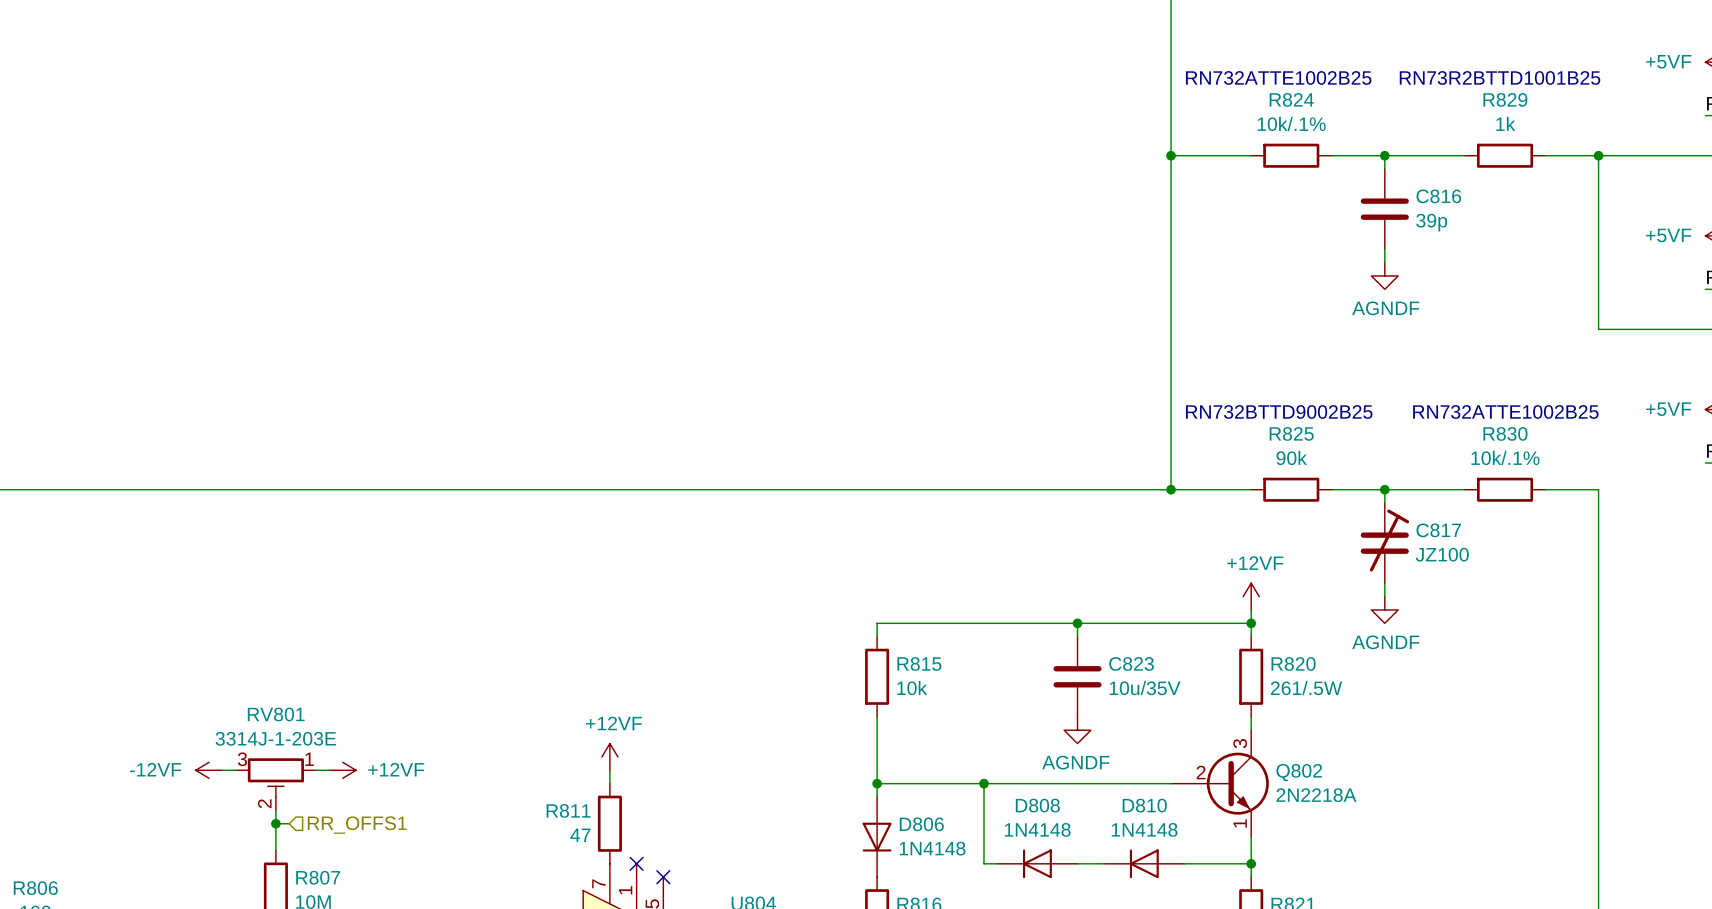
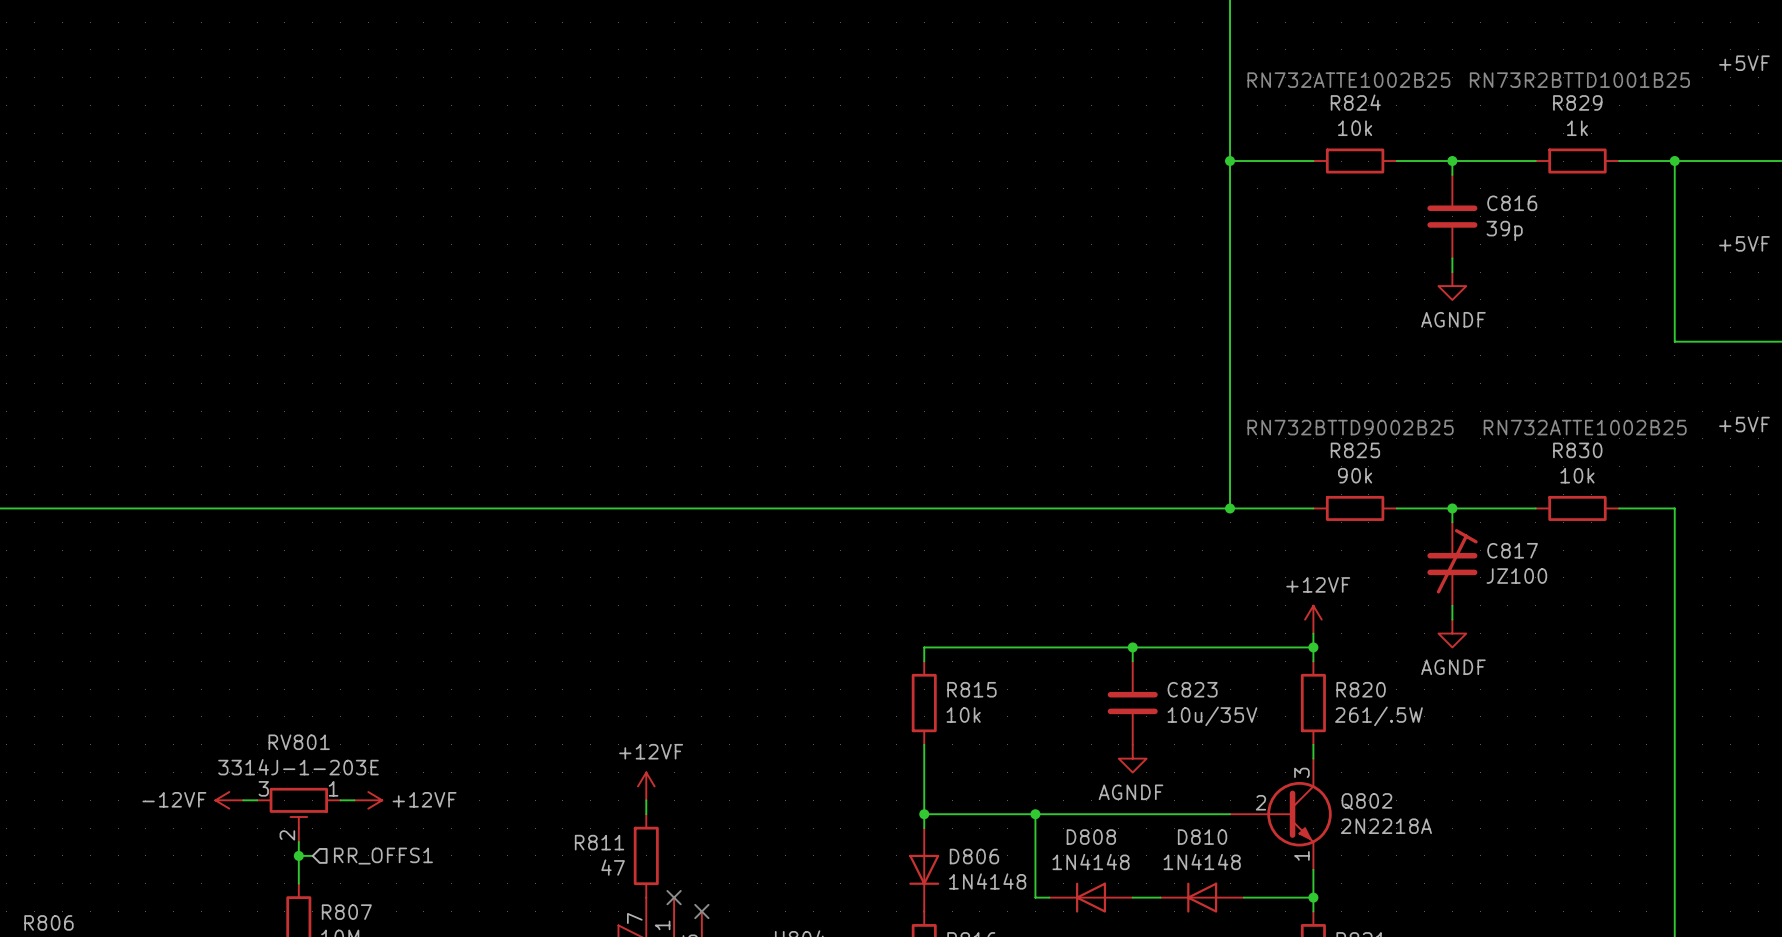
R824 value: 10k/.1% (1291, 123) -> 10k (1355, 128)
R830 value: 10k/.1% (1505, 457) -> 10k (1577, 475)

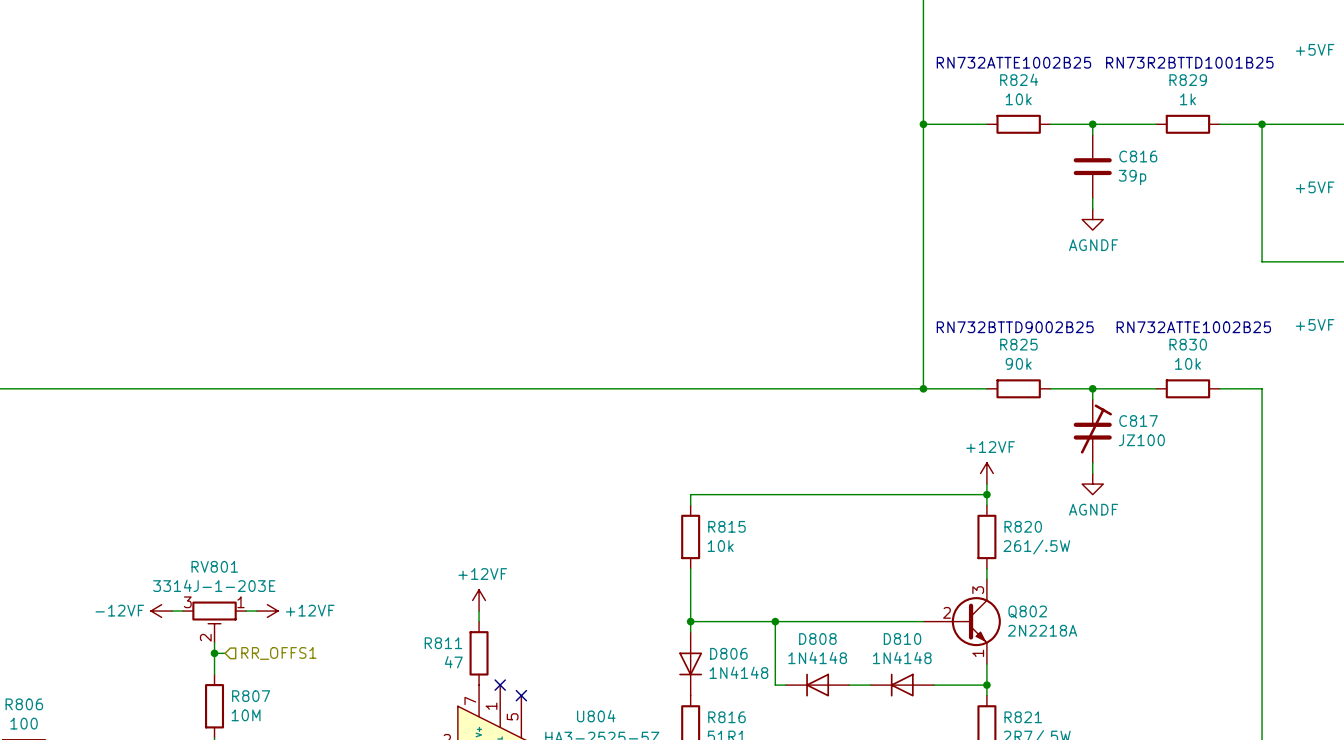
wire: (1132, 647) (1132, 661) -> none
junction: (1132, 647) -> none
C823: 10u/35V (1132, 703) -> none
power symbol: AGNDF (1132, 758) -> none

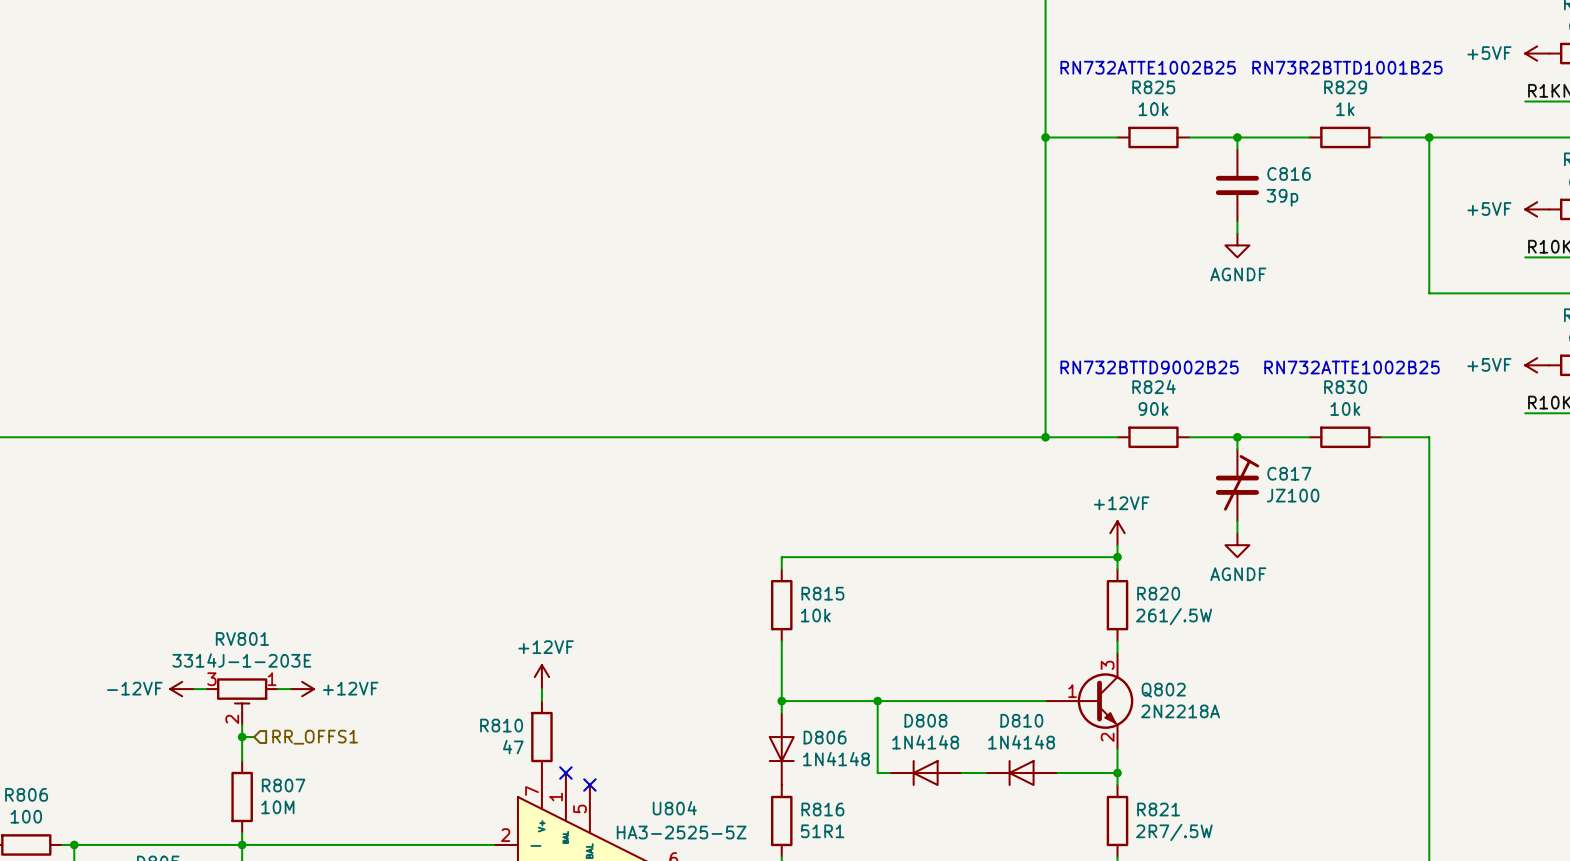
R824 name: R824 (1019, 79) -> R825 (1153, 87)
R825 name: R825 (1018, 344) -> R824 (1154, 386)
Q802 pin number: 2 (946, 612) -> 1 (1072, 691)
R811 name: R811 (443, 643) -> R810 (501, 725)
Q802 pin number: 1 (978, 653) -> 2 (1107, 737)

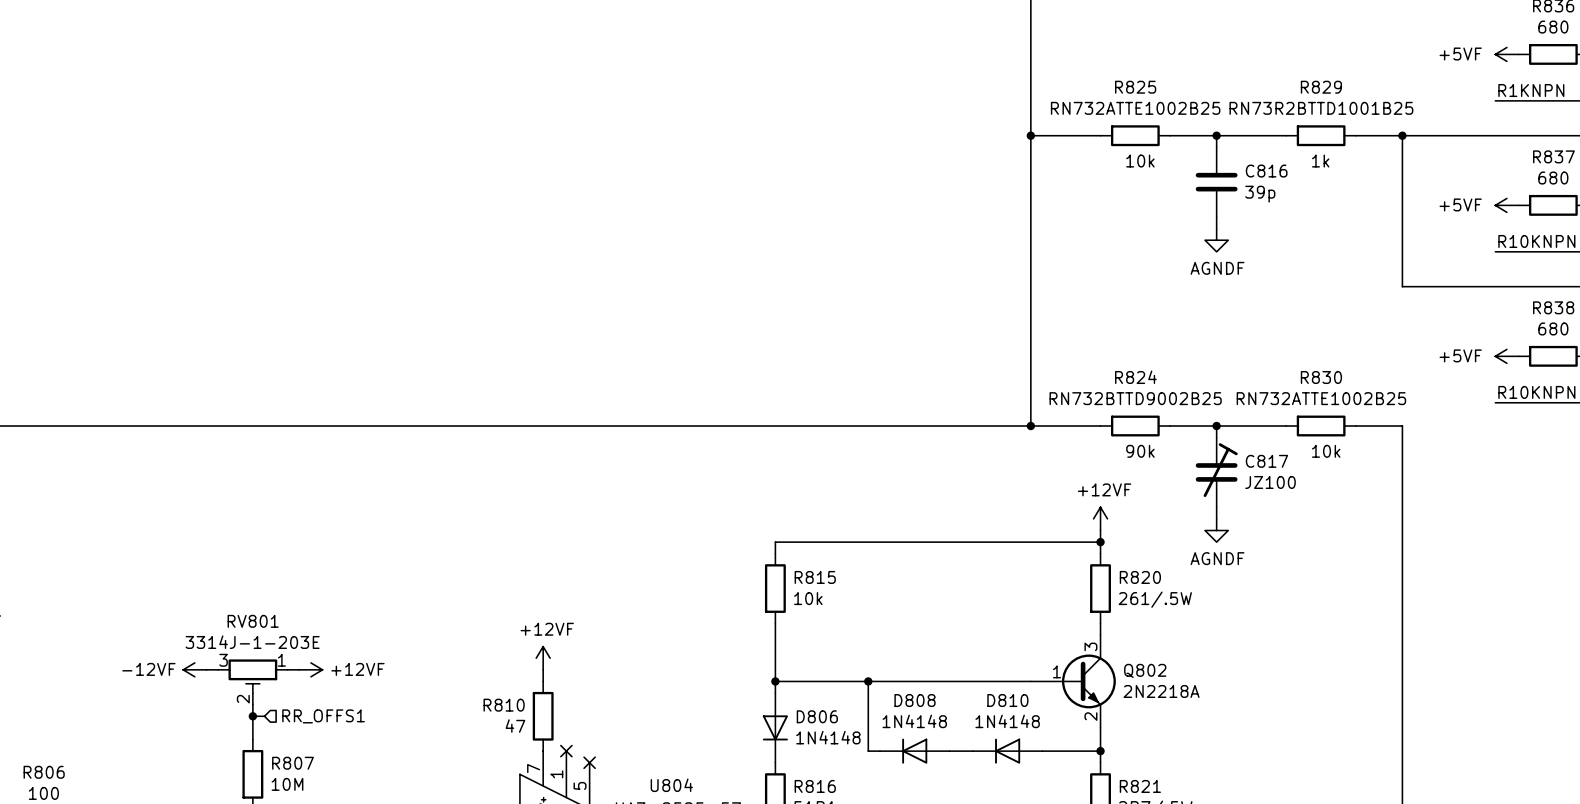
text: RN732ATTE1002B25 (1148, 67) -> none
text: RN73R2BTTD1001B25 (1347, 67) -> none
R825 value: 10k (1153, 109) -> RN732ATTE1002B25 (1135, 108)
R829 value: 1k (1345, 109) -> RN73R2BTTD1001B25 (1321, 108)
text: none -> 10k (1140, 161)
text: none -> 1k (1320, 161)
text: RN732BTTD9002B25 (1149, 367) -> none
text: RN732ATTE1002B25 (1351, 367) -> none
R824 value: 90k (1153, 409) -> RN732BTTD9002B25 (1135, 398)
R830 value: 10k (1345, 409) -> RN732ATTE1002B25 (1321, 398)
text: none -> 90k (1140, 451)
text: none -> 10k (1326, 451)

